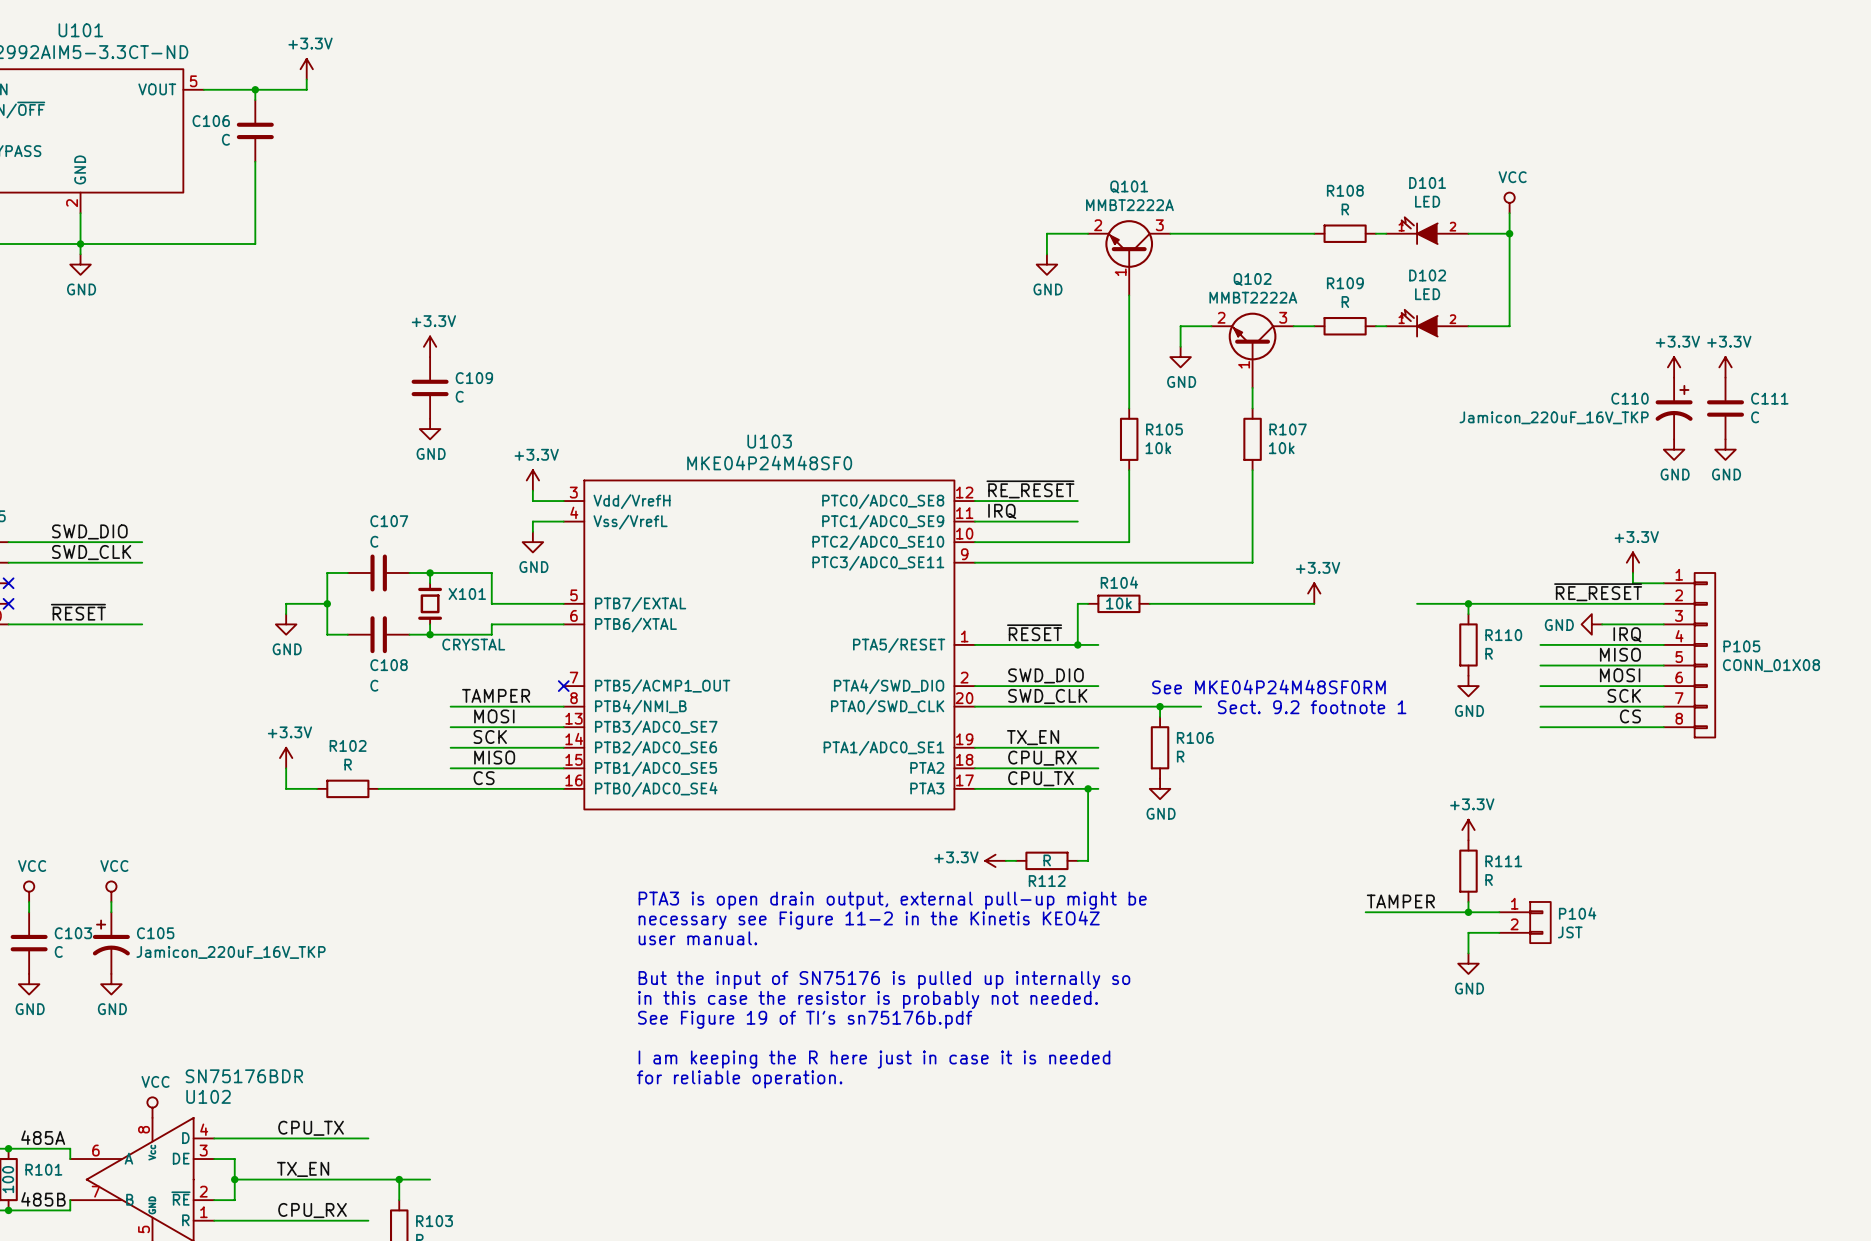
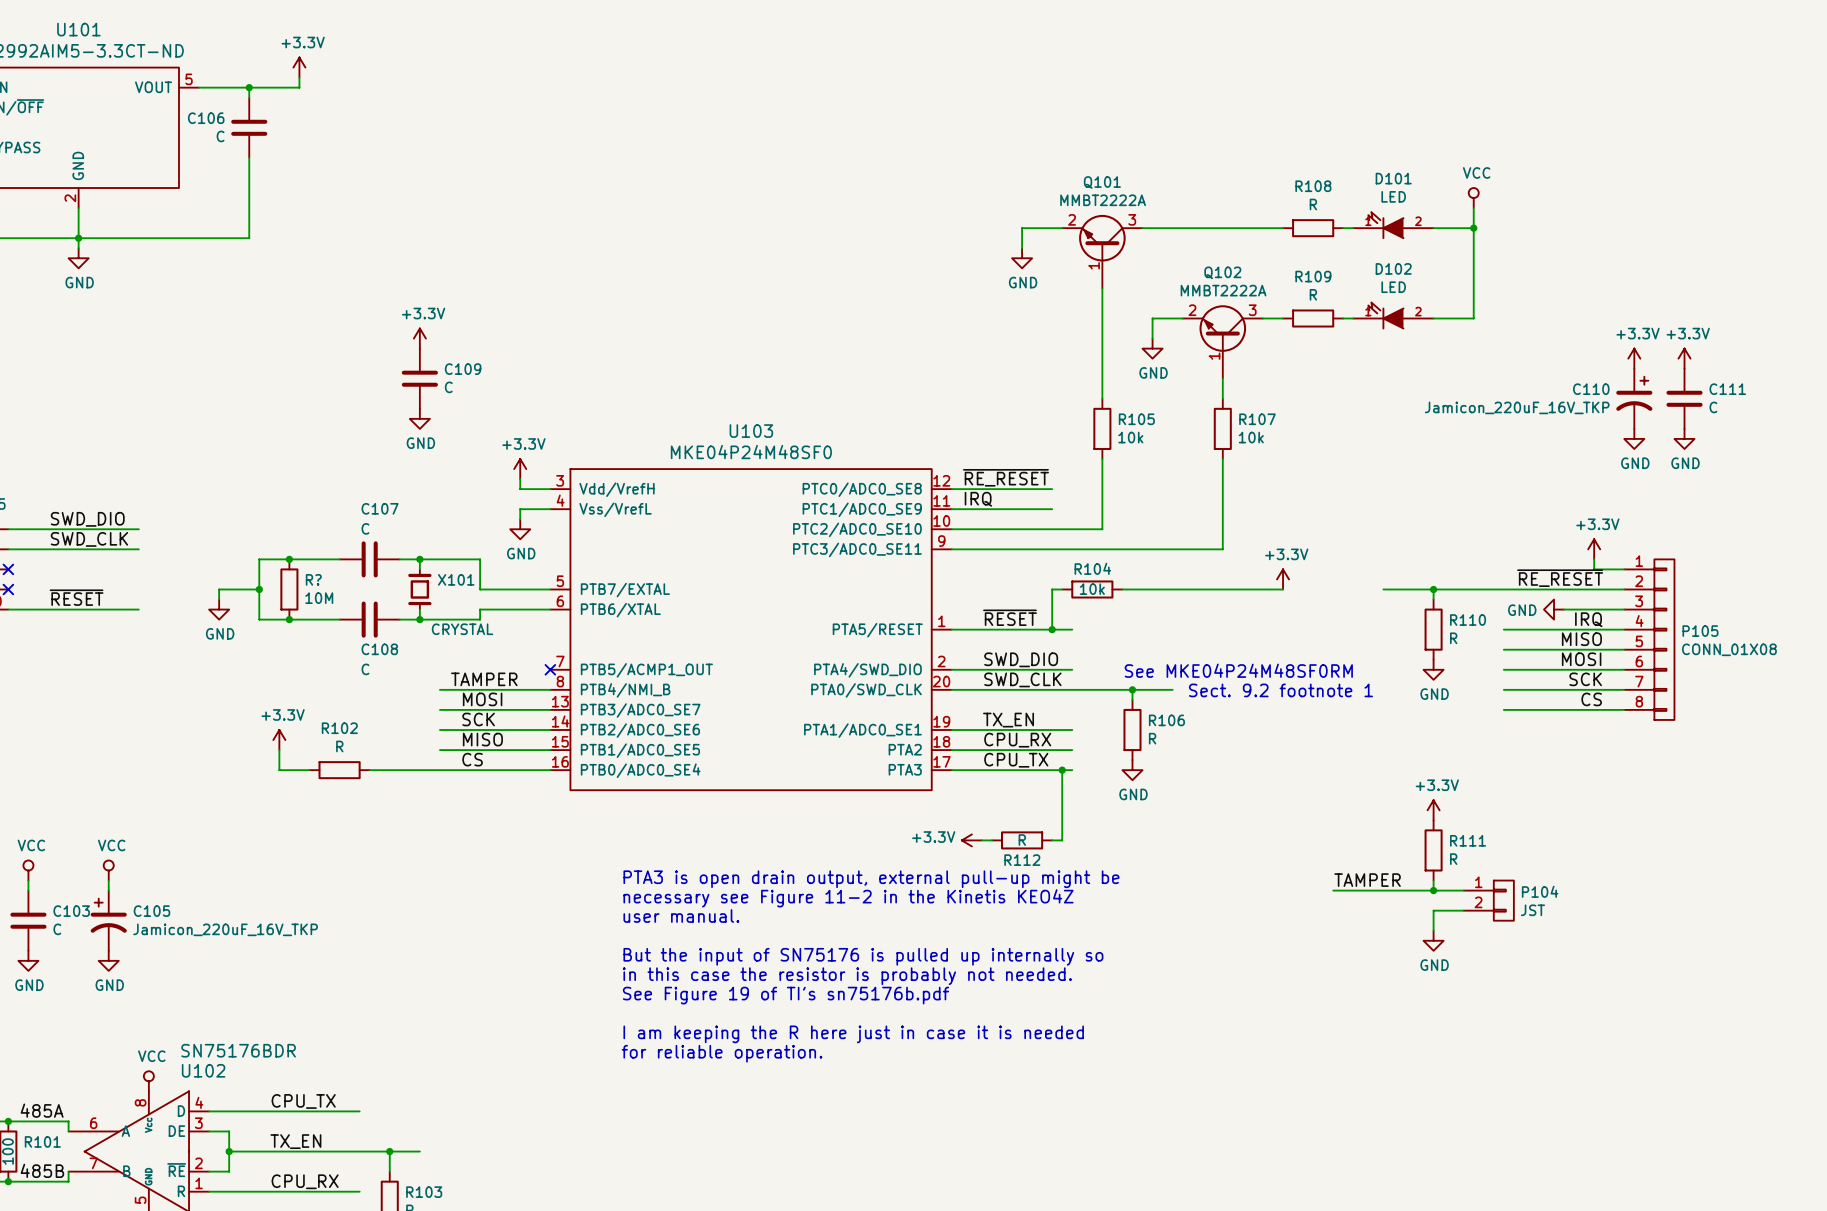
junction: none -> (289, 559)
wire: (327, 572) (327, 634) -> (319, 559) (259, 559) (259, 619) (319, 619)
junction: none -> (259, 589)
R?: none -> 10M (289, 589)
wire: (327, 603) (286, 603) (286, 614) -> (259, 589) (219, 589) (219, 599)
junction: (327, 603) -> none
power symbol position: GND (286, 624) -> GND (219, 609)
junction: none -> (289, 619)

